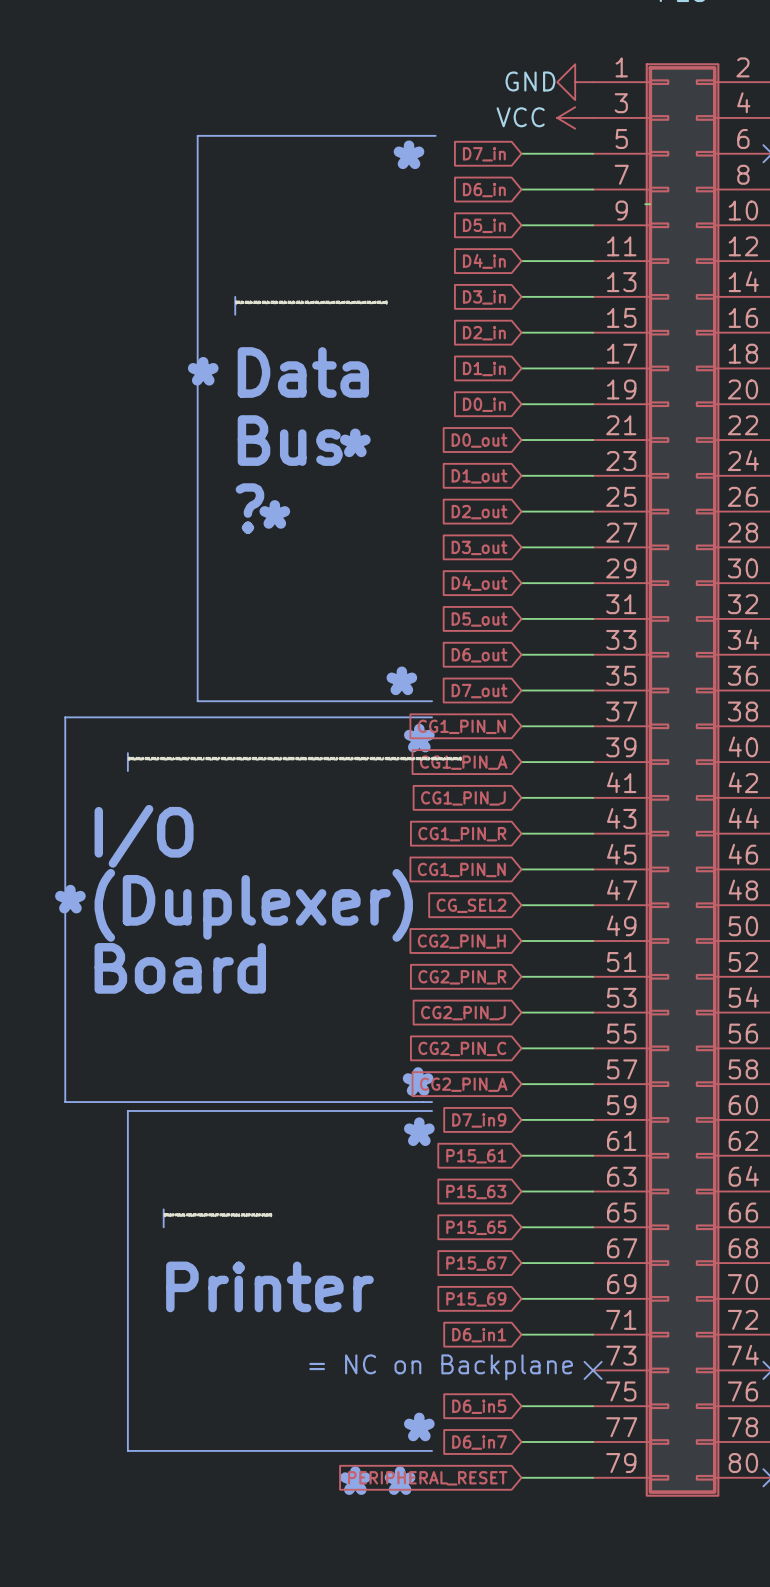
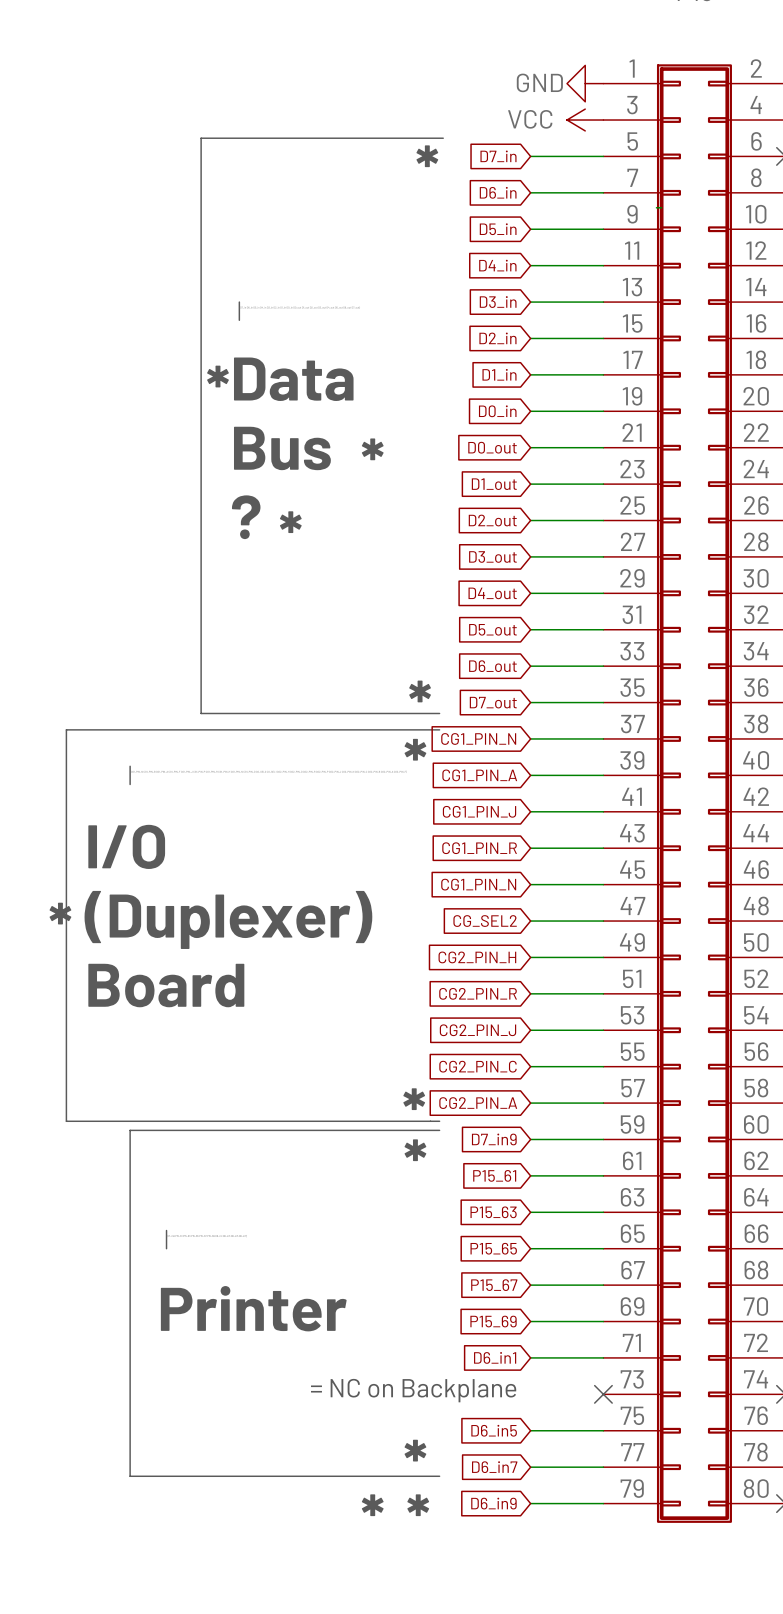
global label: PERIPHERAL_RESET (427, 1478) -> D6_in9 (493, 1503)

